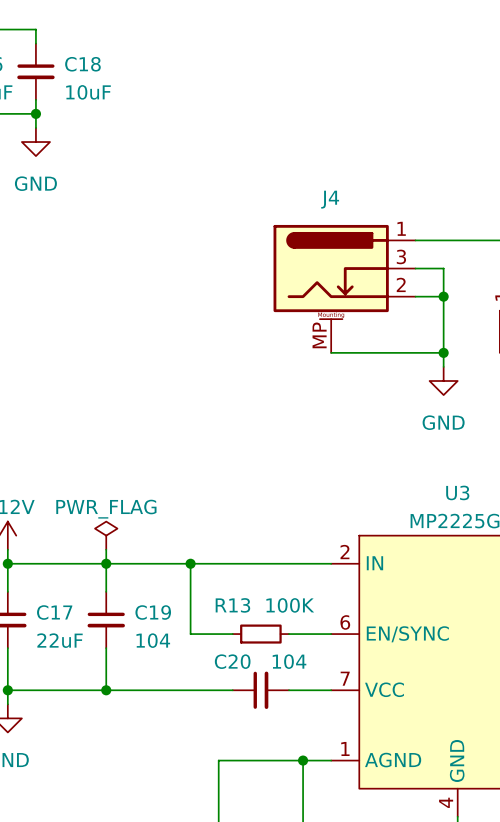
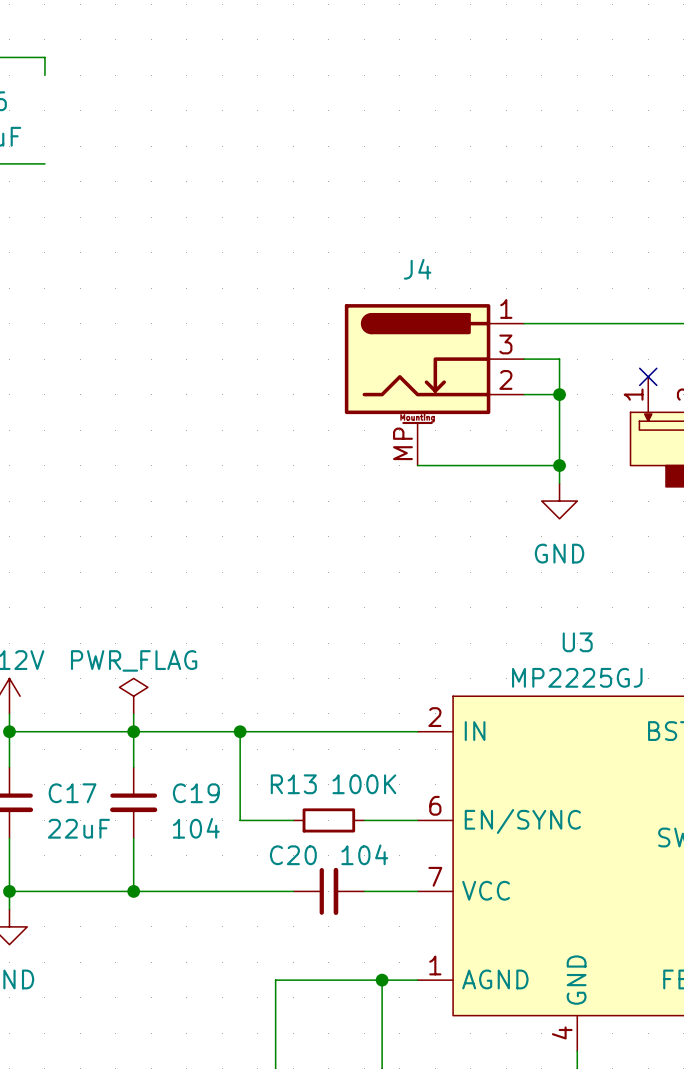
C18: 10uF (35, 71) -> none
wire: (35, 99) (35, 127) -> none
junction: (35, 113) -> none
power symbol: GND (35, 142) -> none

